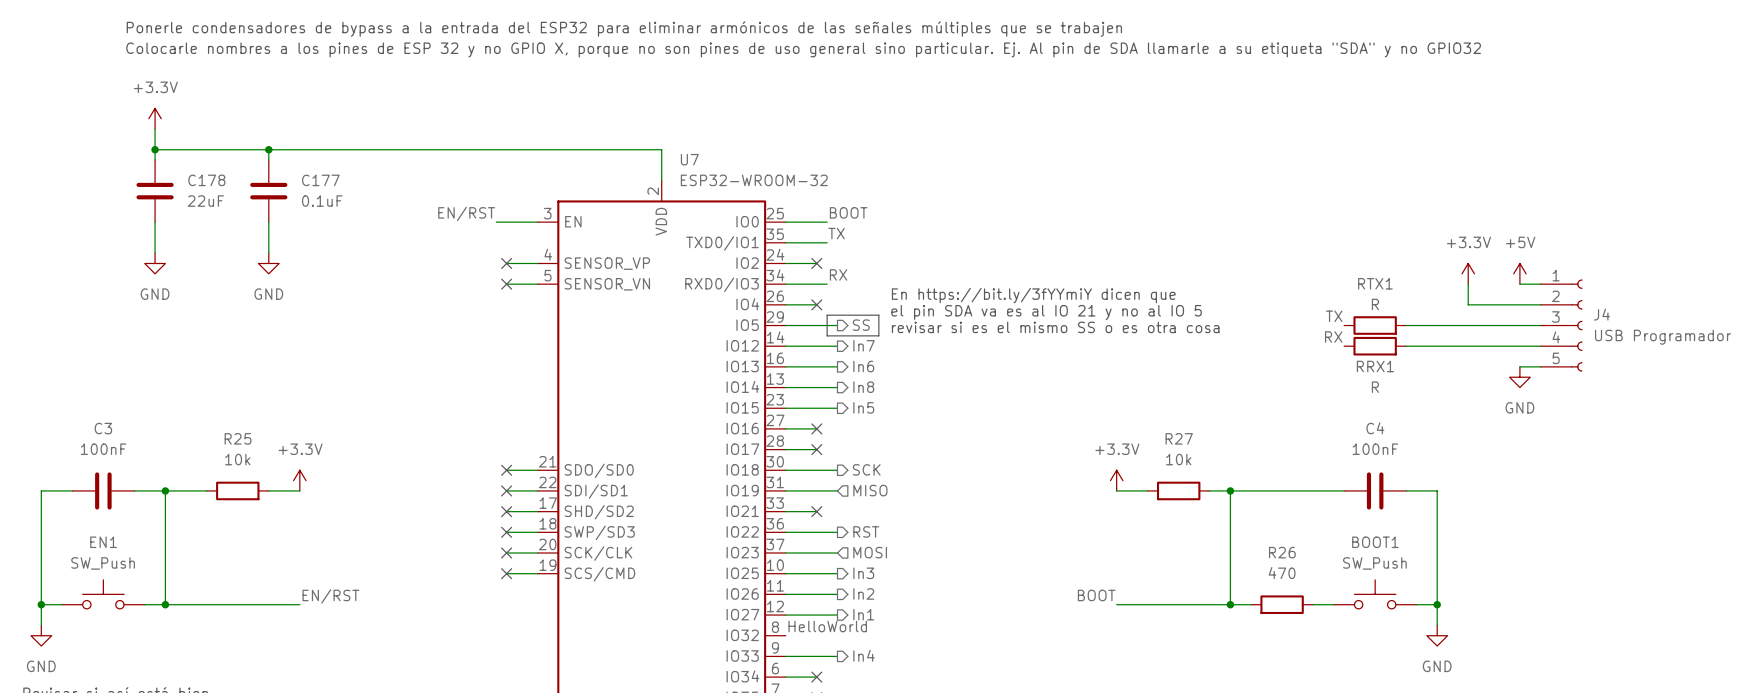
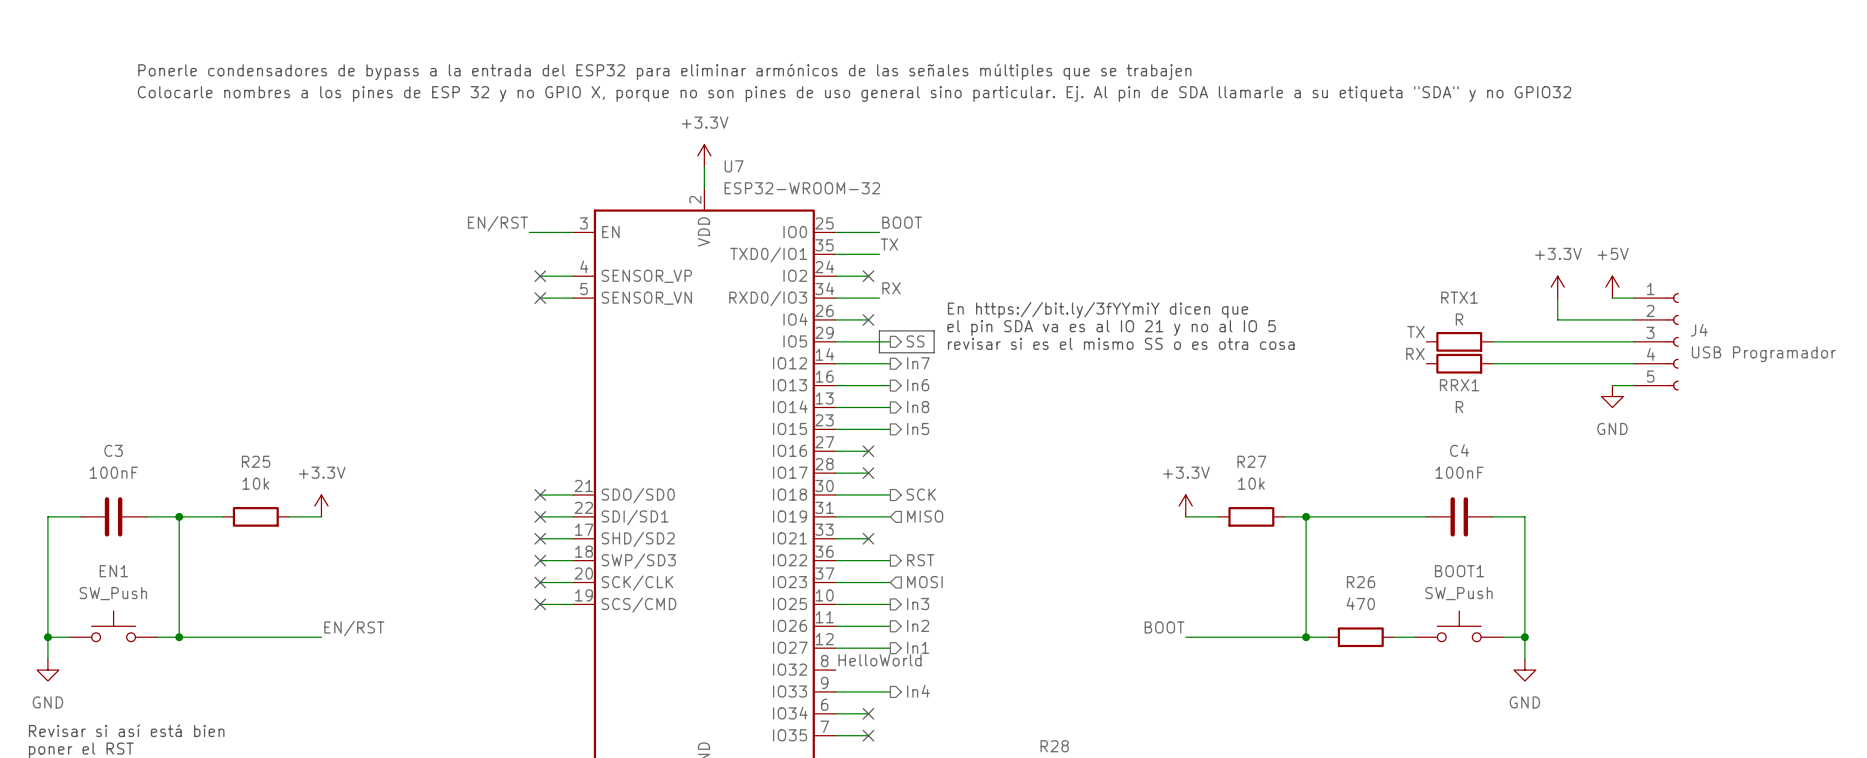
text position: Ponerle condensadores de bypass a la entrada del ESP32 para eliminar armónicos de las señales múltiples que se trabajen (624, 29) -> Ponerle condensadores de bypass a la entrada del ESP32 para eliminar armónicos de las señales múltiples que se trabajen (664, 71)
text position: Colocarle nombres a los pines de ESP 32 y no GPIO X, porque no son pines de uso general sino particular. Ej. Al pin de SDA llamarle a su etiqueta "SDA" y no GPIO32 (803, 49) -> Colocarle nombres a los pines de ESP 32 y no GPIO X, porque no son pines de uso general sino particular. Ej. Al pin de SDA llamarle a su etiqueta "SDA" y no GPIO32 (854, 94)
power symbol: +3.3V (155, 118) -> none
wire: (155, 129) (155, 160) -> none
wire: (155, 149) (661, 149) (661, 160) -> none
junction: (155, 149) -> none
wire: (268, 149) (268, 160) -> none
junction: (268, 149) -> none
power symbol: none -> +3.3V (704, 155)
C178: 22uF (155, 191) -> none
C177: 0.1uF (268, 191) -> none
wire: (155, 222) (155, 253) -> none
wire: (268, 222) (268, 253) -> none
power symbol: GND (155, 263) -> none
power symbol: GND (268, 263) -> none

